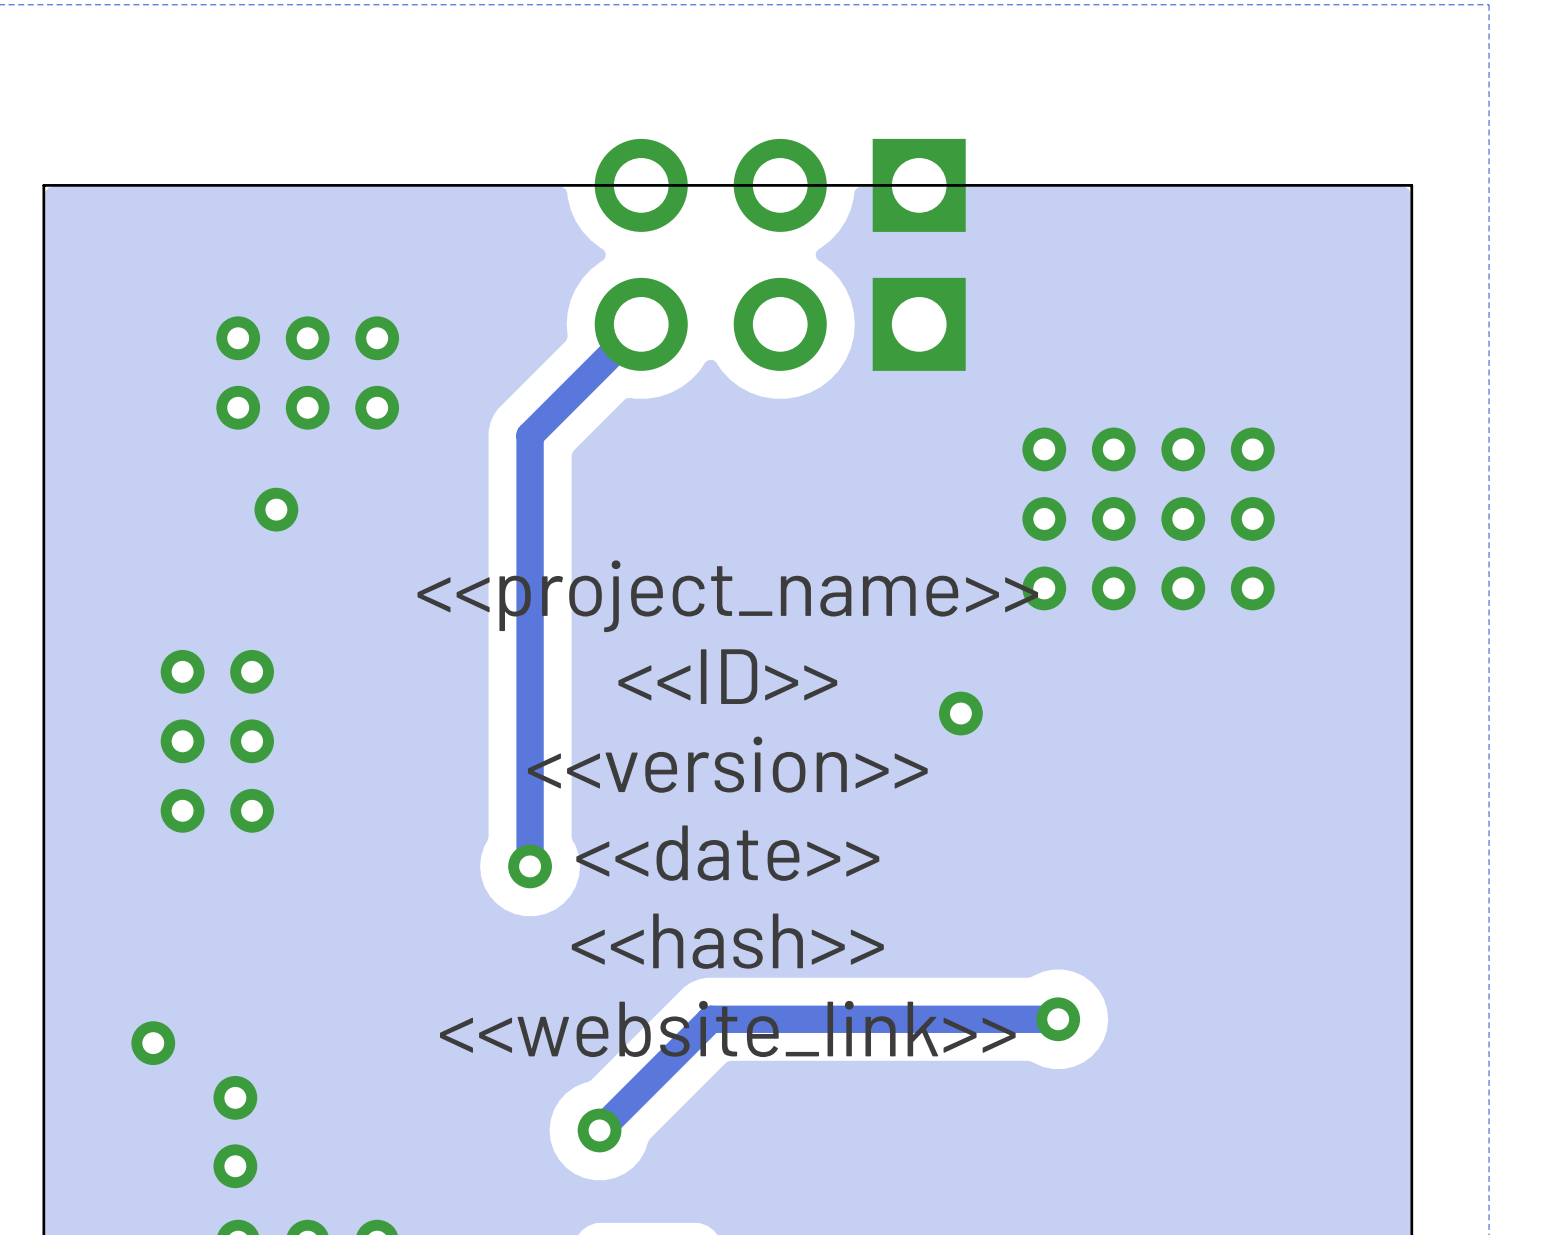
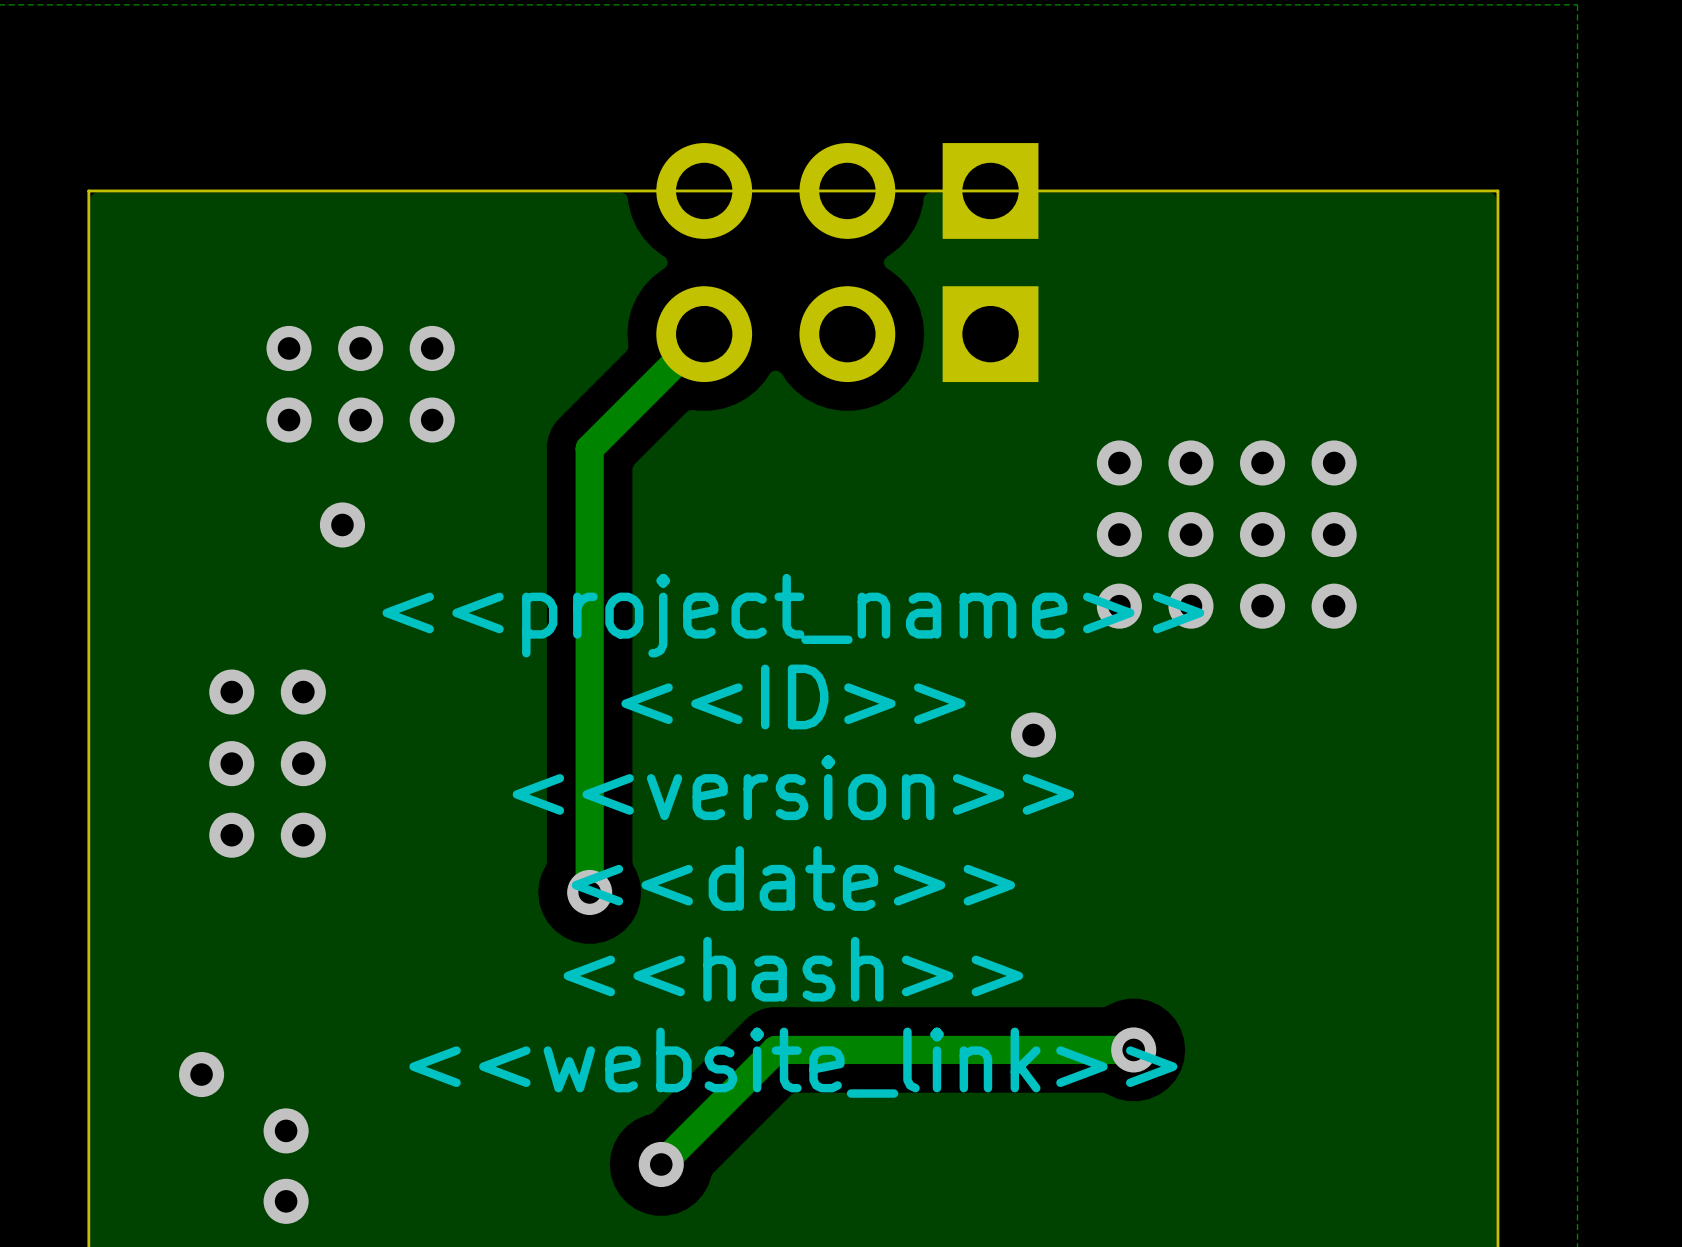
via position: (276, 509) -> (342, 524)

